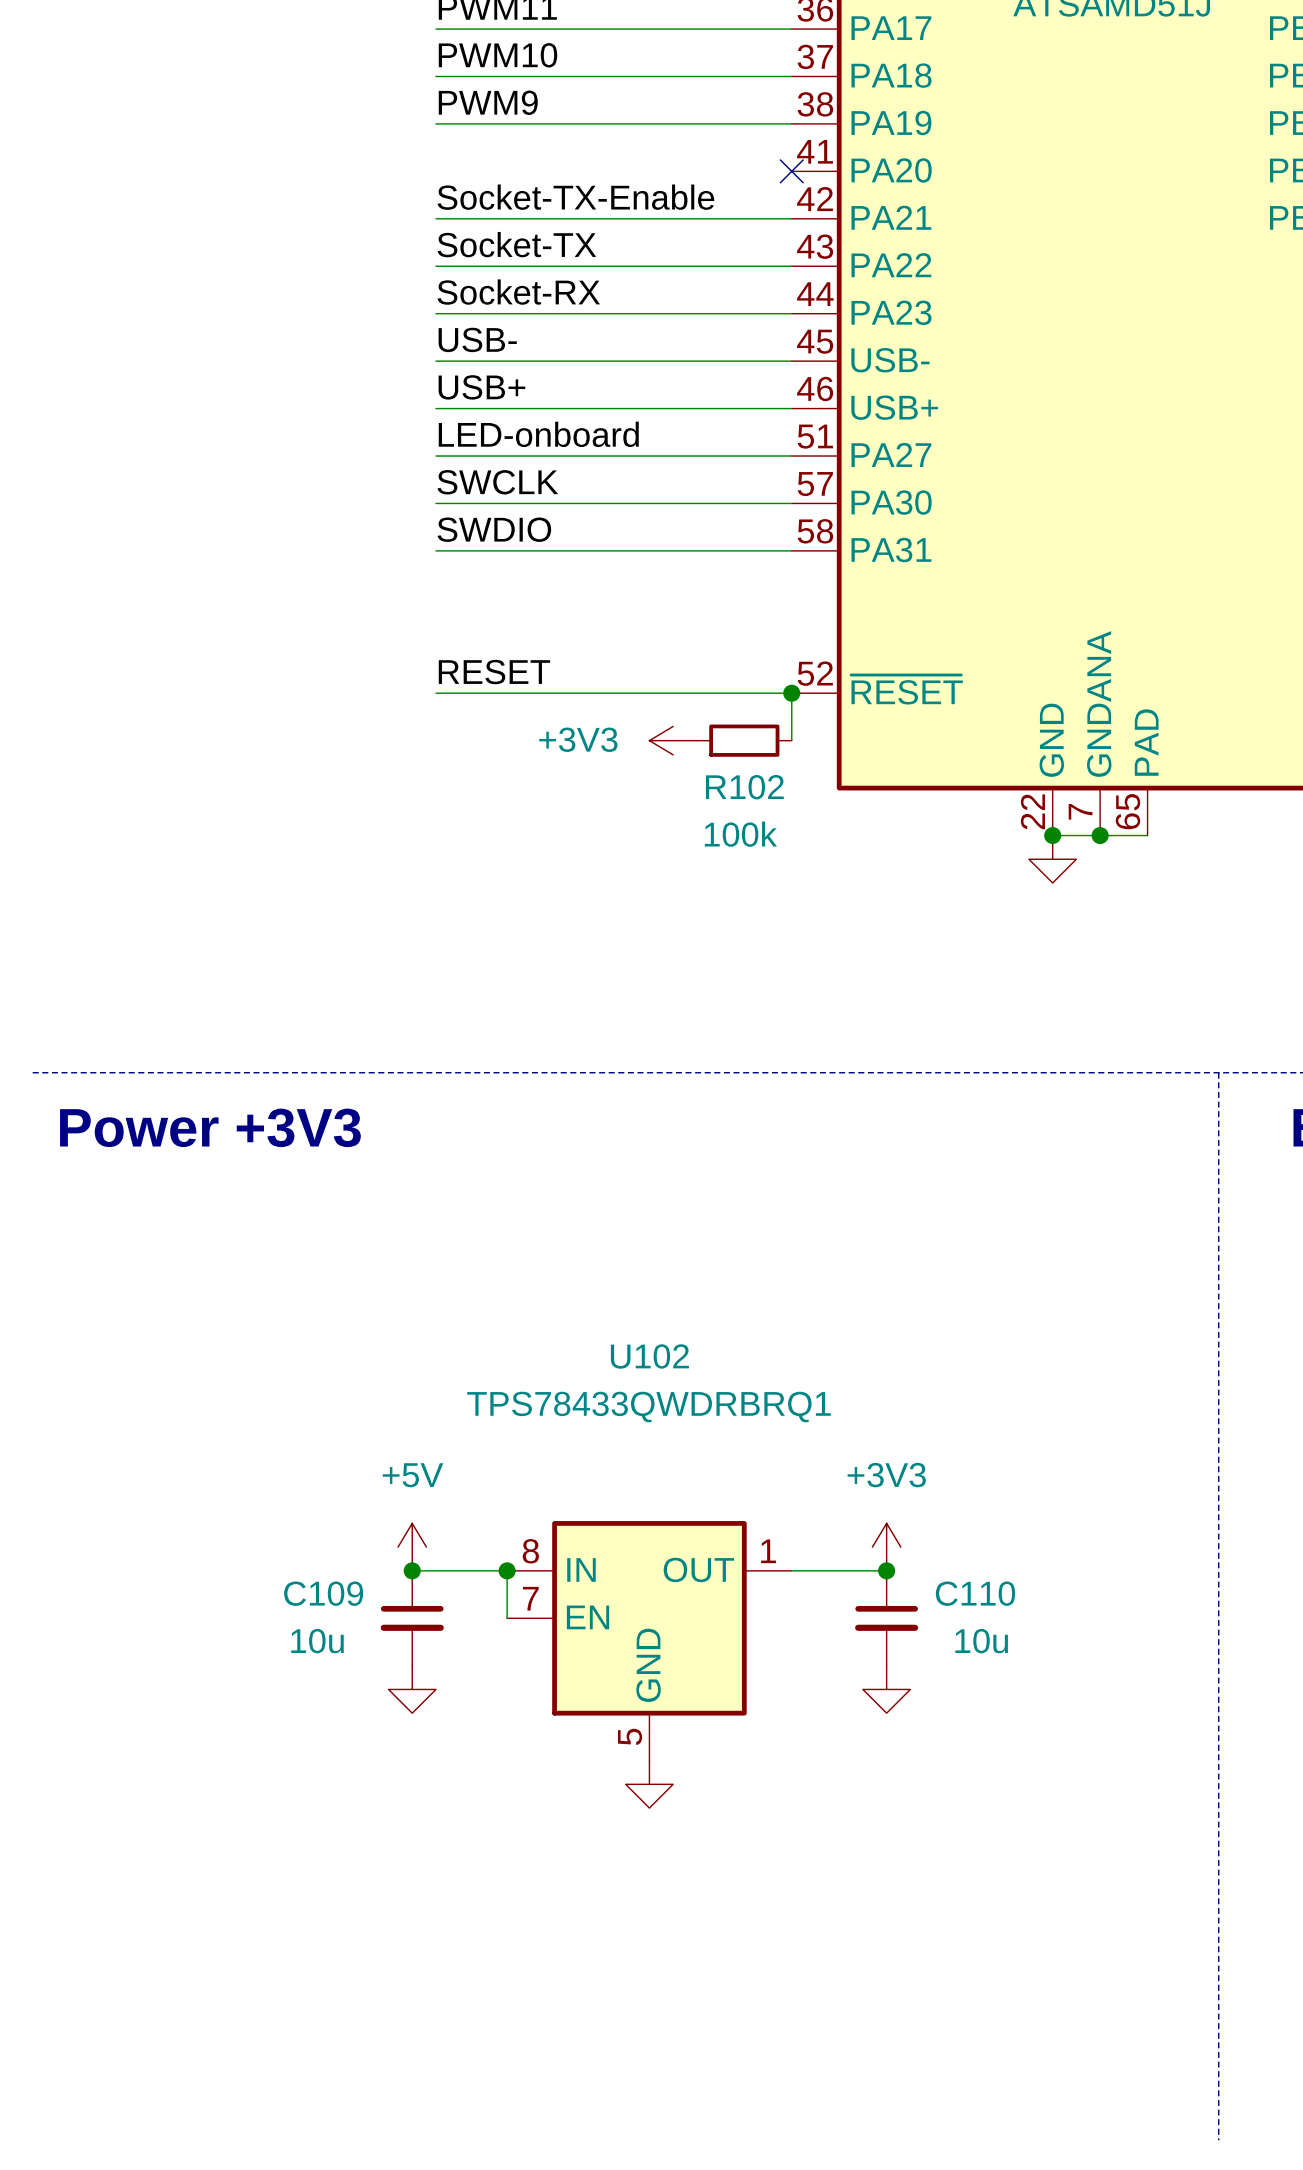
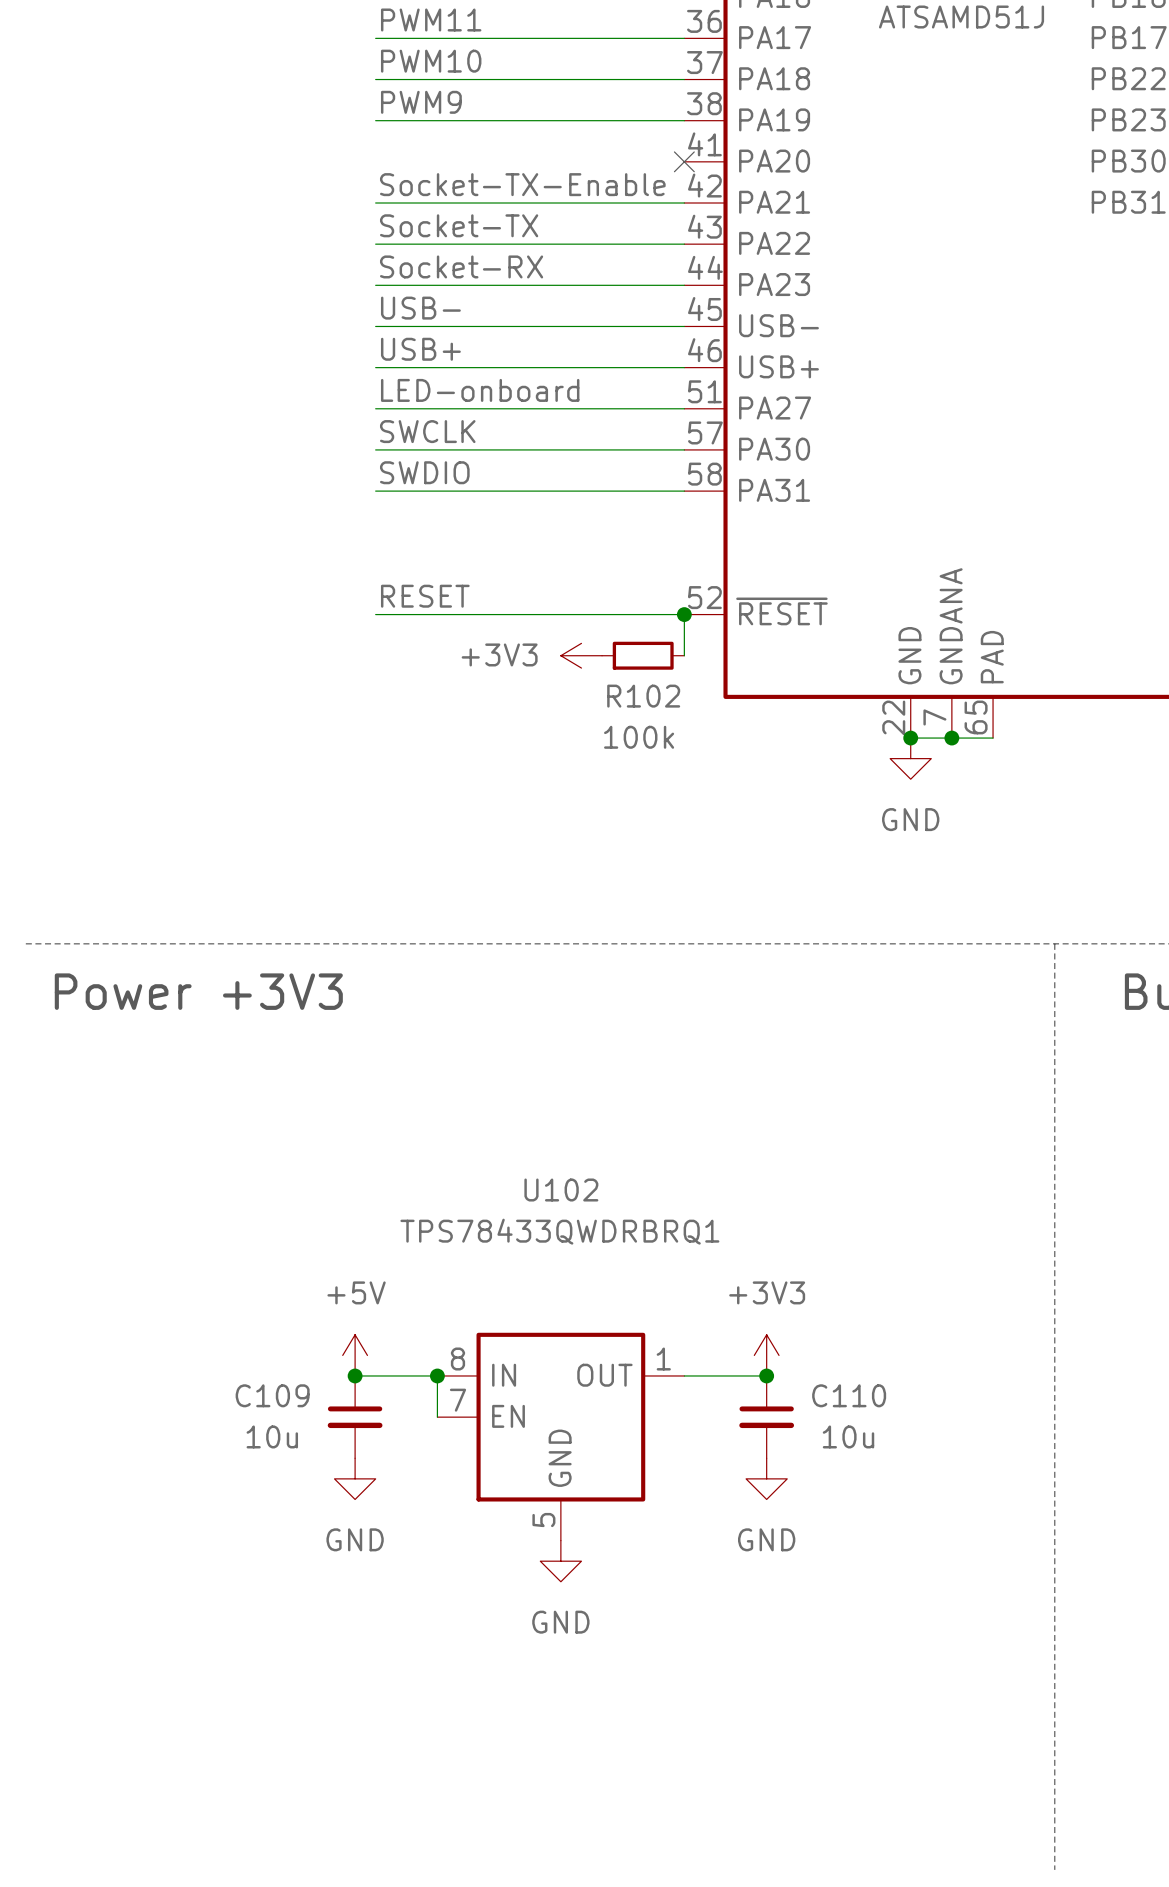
power symbol text: none -> GND (910, 819)
power symbol text: none -> GND (355, 1539)
power symbol text: none -> GND (766, 1539)
power symbol text: none -> GND (560, 1622)

